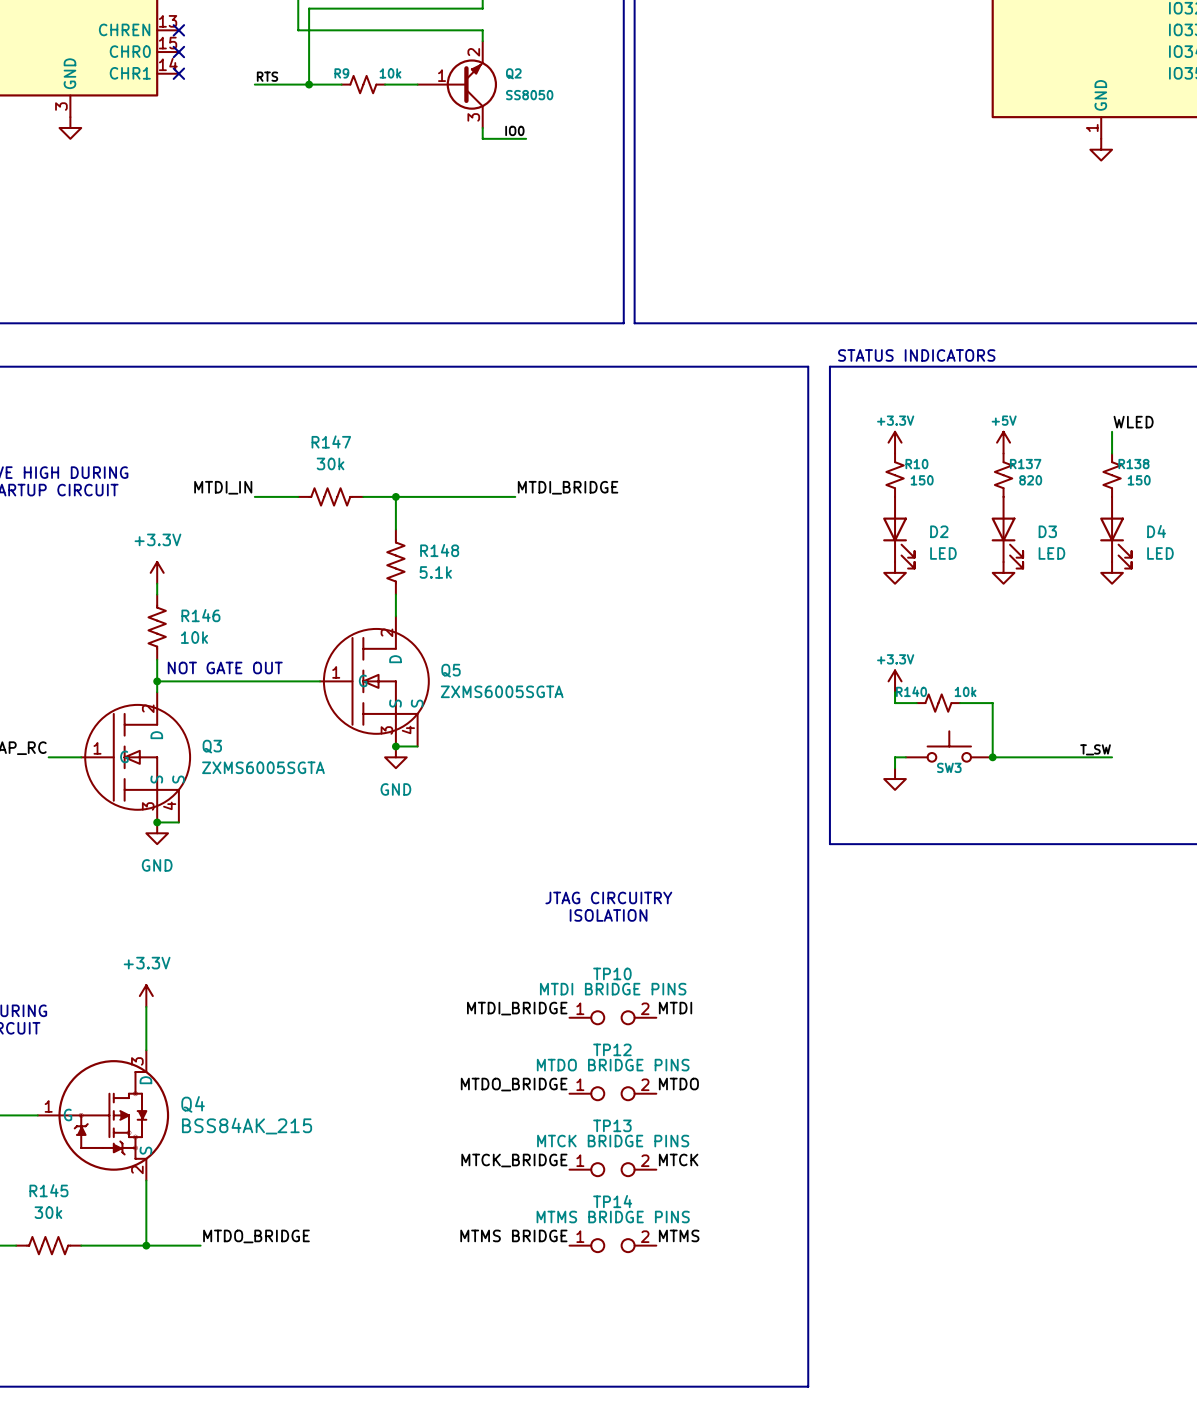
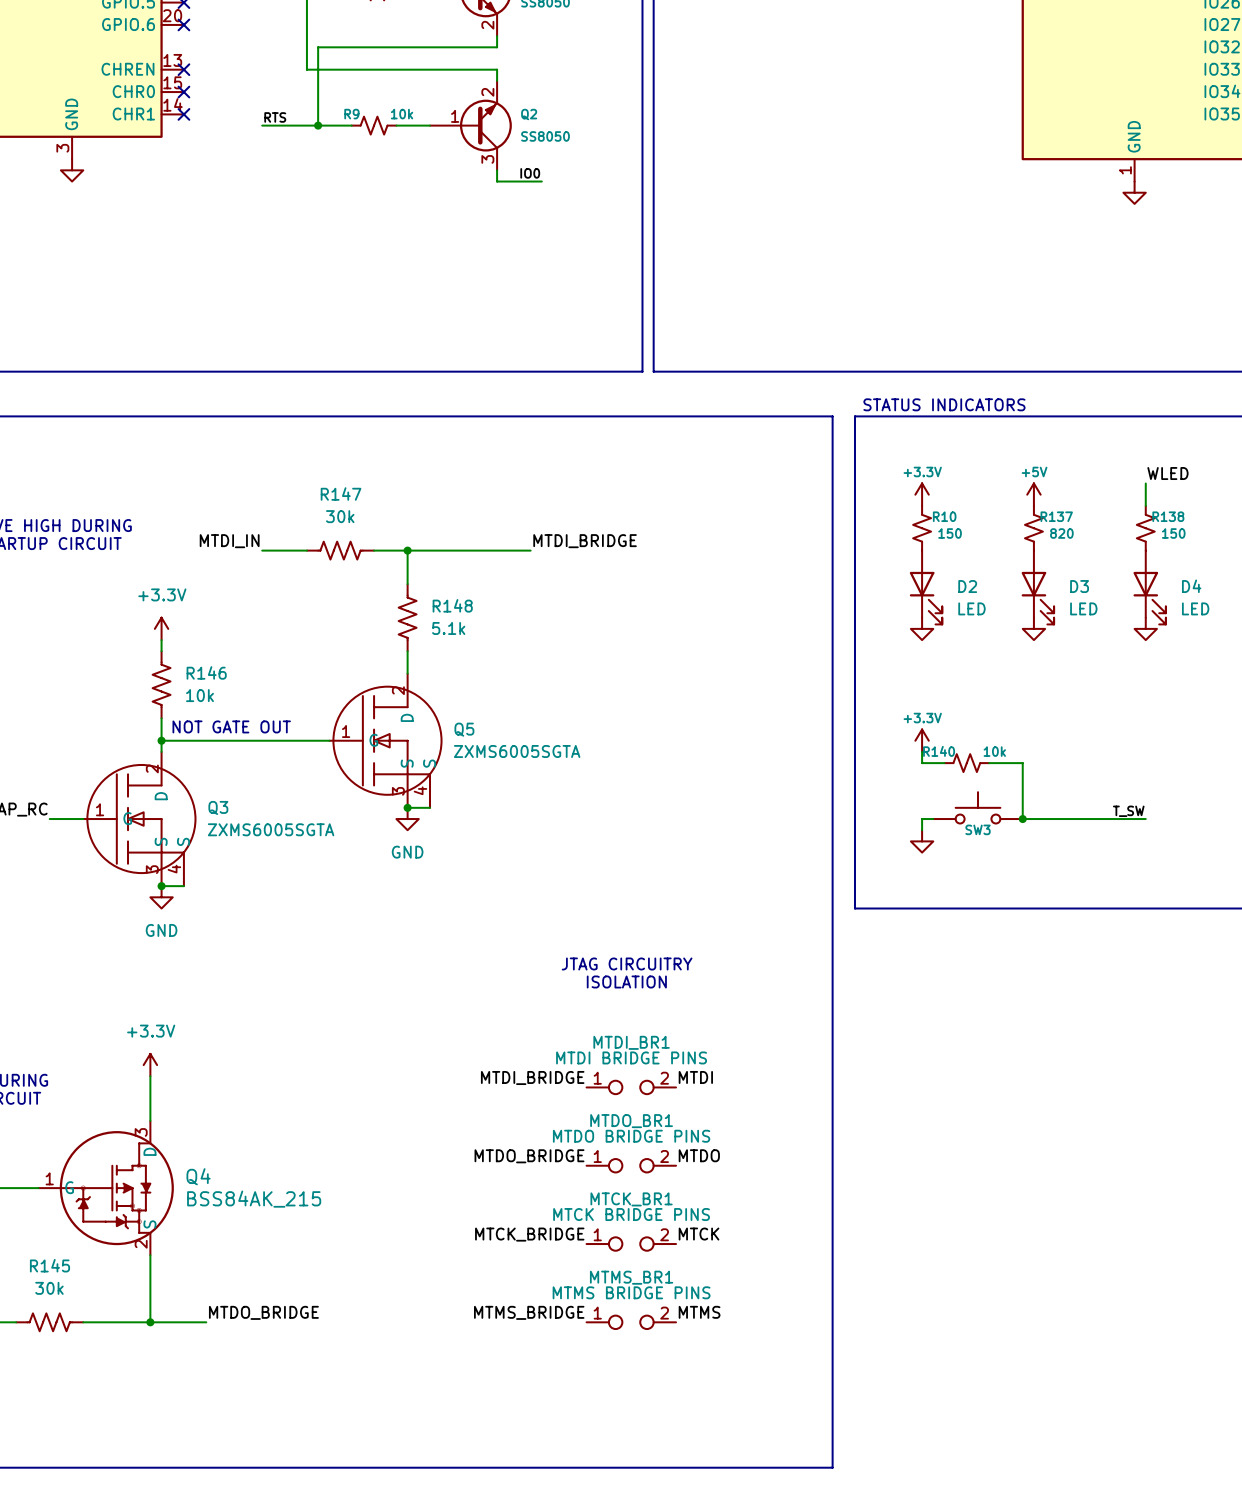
TP10 name: TP10 (612, 973) -> MTDI_BR1 (631, 1042)
TP12 name: TP12 (612, 1049) -> MTDO_BR1 (631, 1121)
TP13 name: TP13 (612, 1125) -> MTCK_BR1 (631, 1199)
TP14 name: TP14 (612, 1201) -> MTMS_BR1 (631, 1277)
label: MTMS BRIDGE (513, 1235) -> MTMS_BRIDGE (529, 1312)

